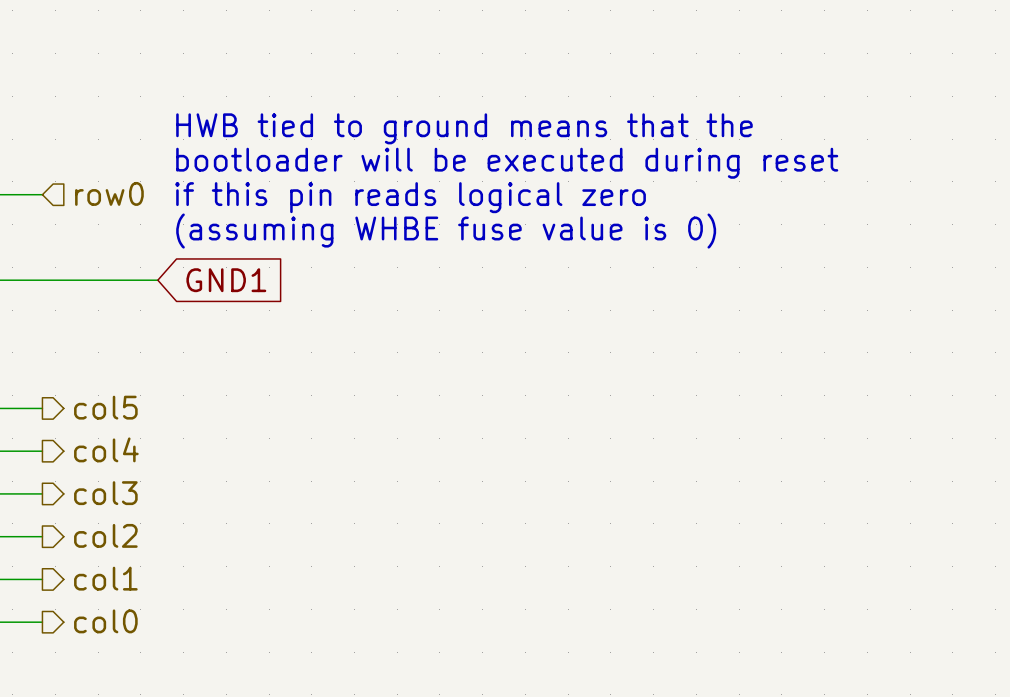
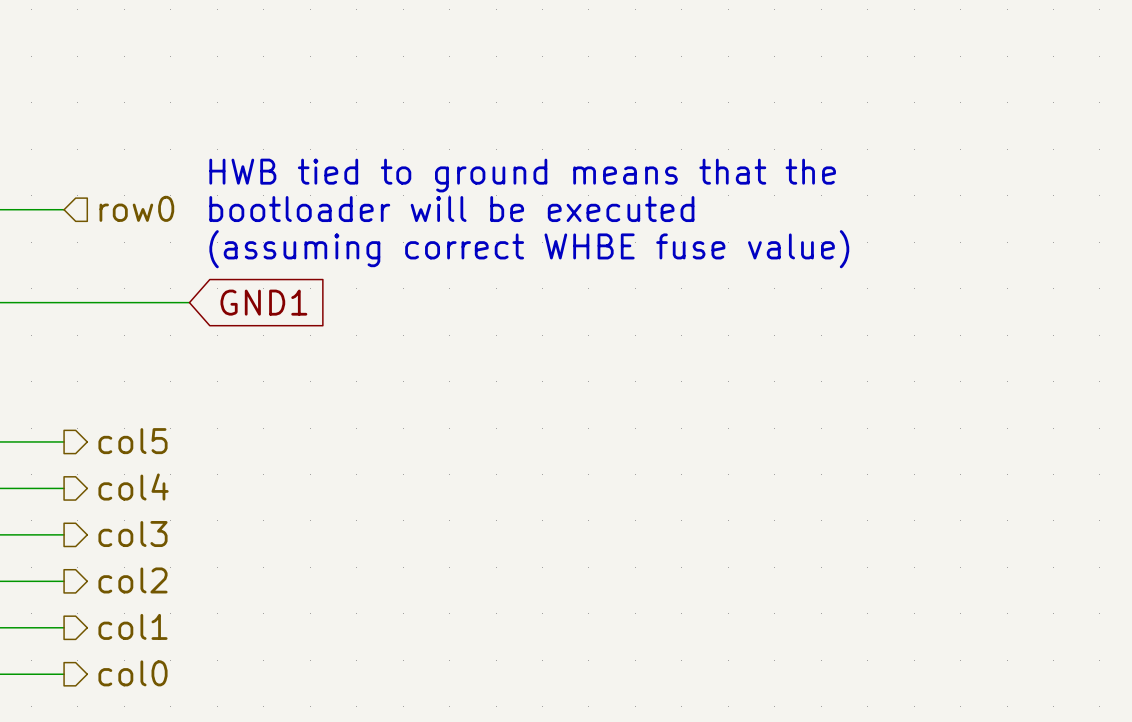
text: HWB tied to ground means that the (464, 128) -> none
text: bootloader will be executed during reset (507, 163) -> HWB tied to ground means that the (522, 175)
text: if this pin reads logical zero (410, 197) -> bootloader will be executed (451, 209)
text: (assuming WHBE fuse value is 0) (446, 231) -> (assuming correct WHBE fuse value) (529, 249)

